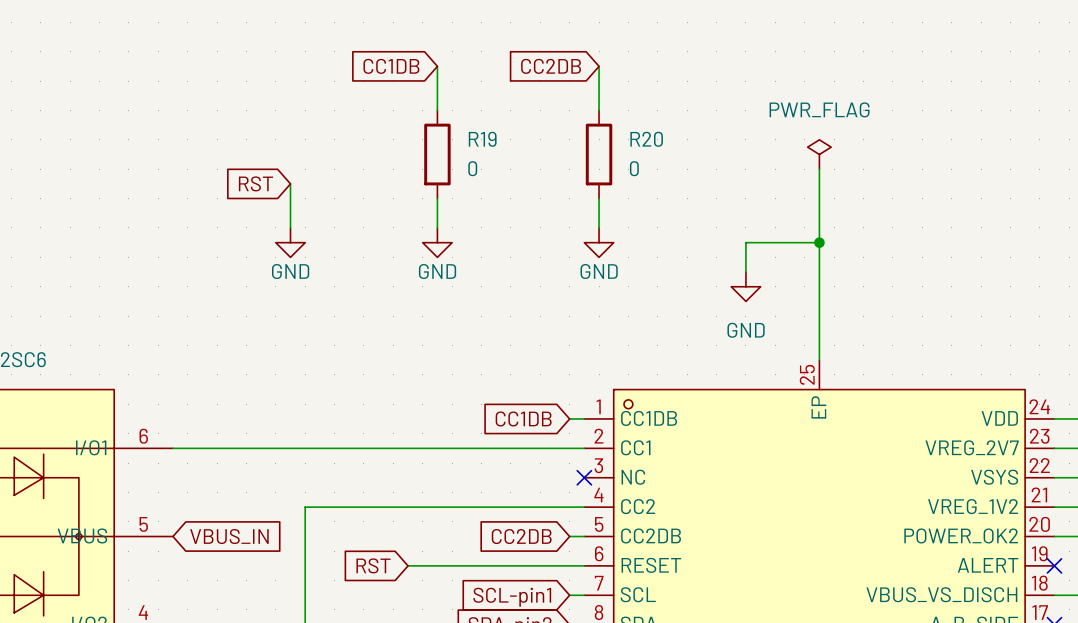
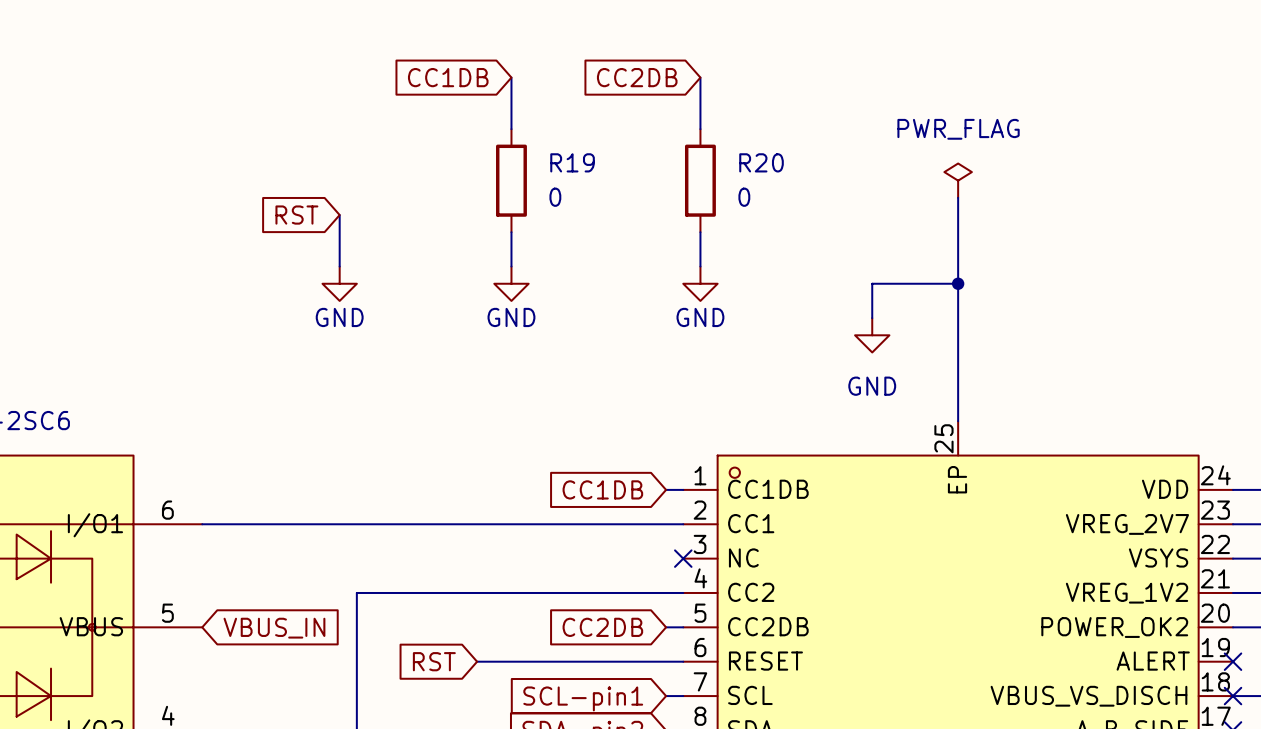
no-connect mark: none -> (1233, 696)

